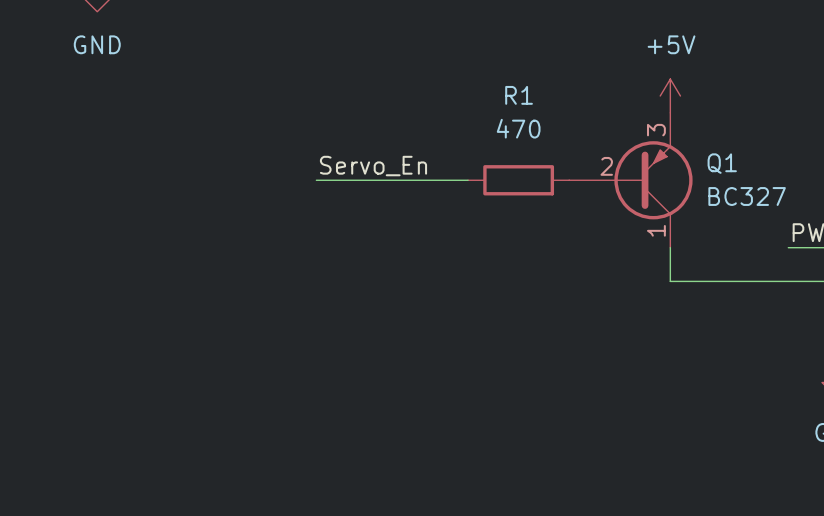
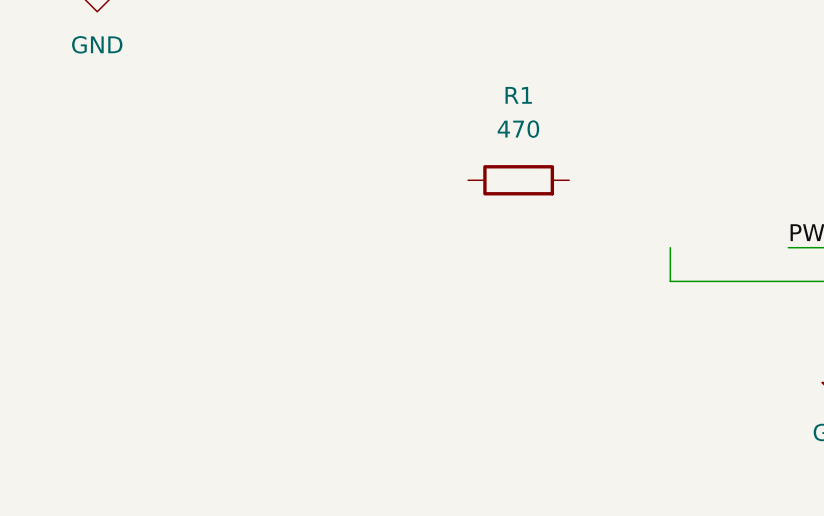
power symbol: +5V (670, 96) -> none
label: Servo_En (373, 166) -> none
wire: (316, 180) (468, 180) -> none
Q1: BC327 (630, 180) -> none

